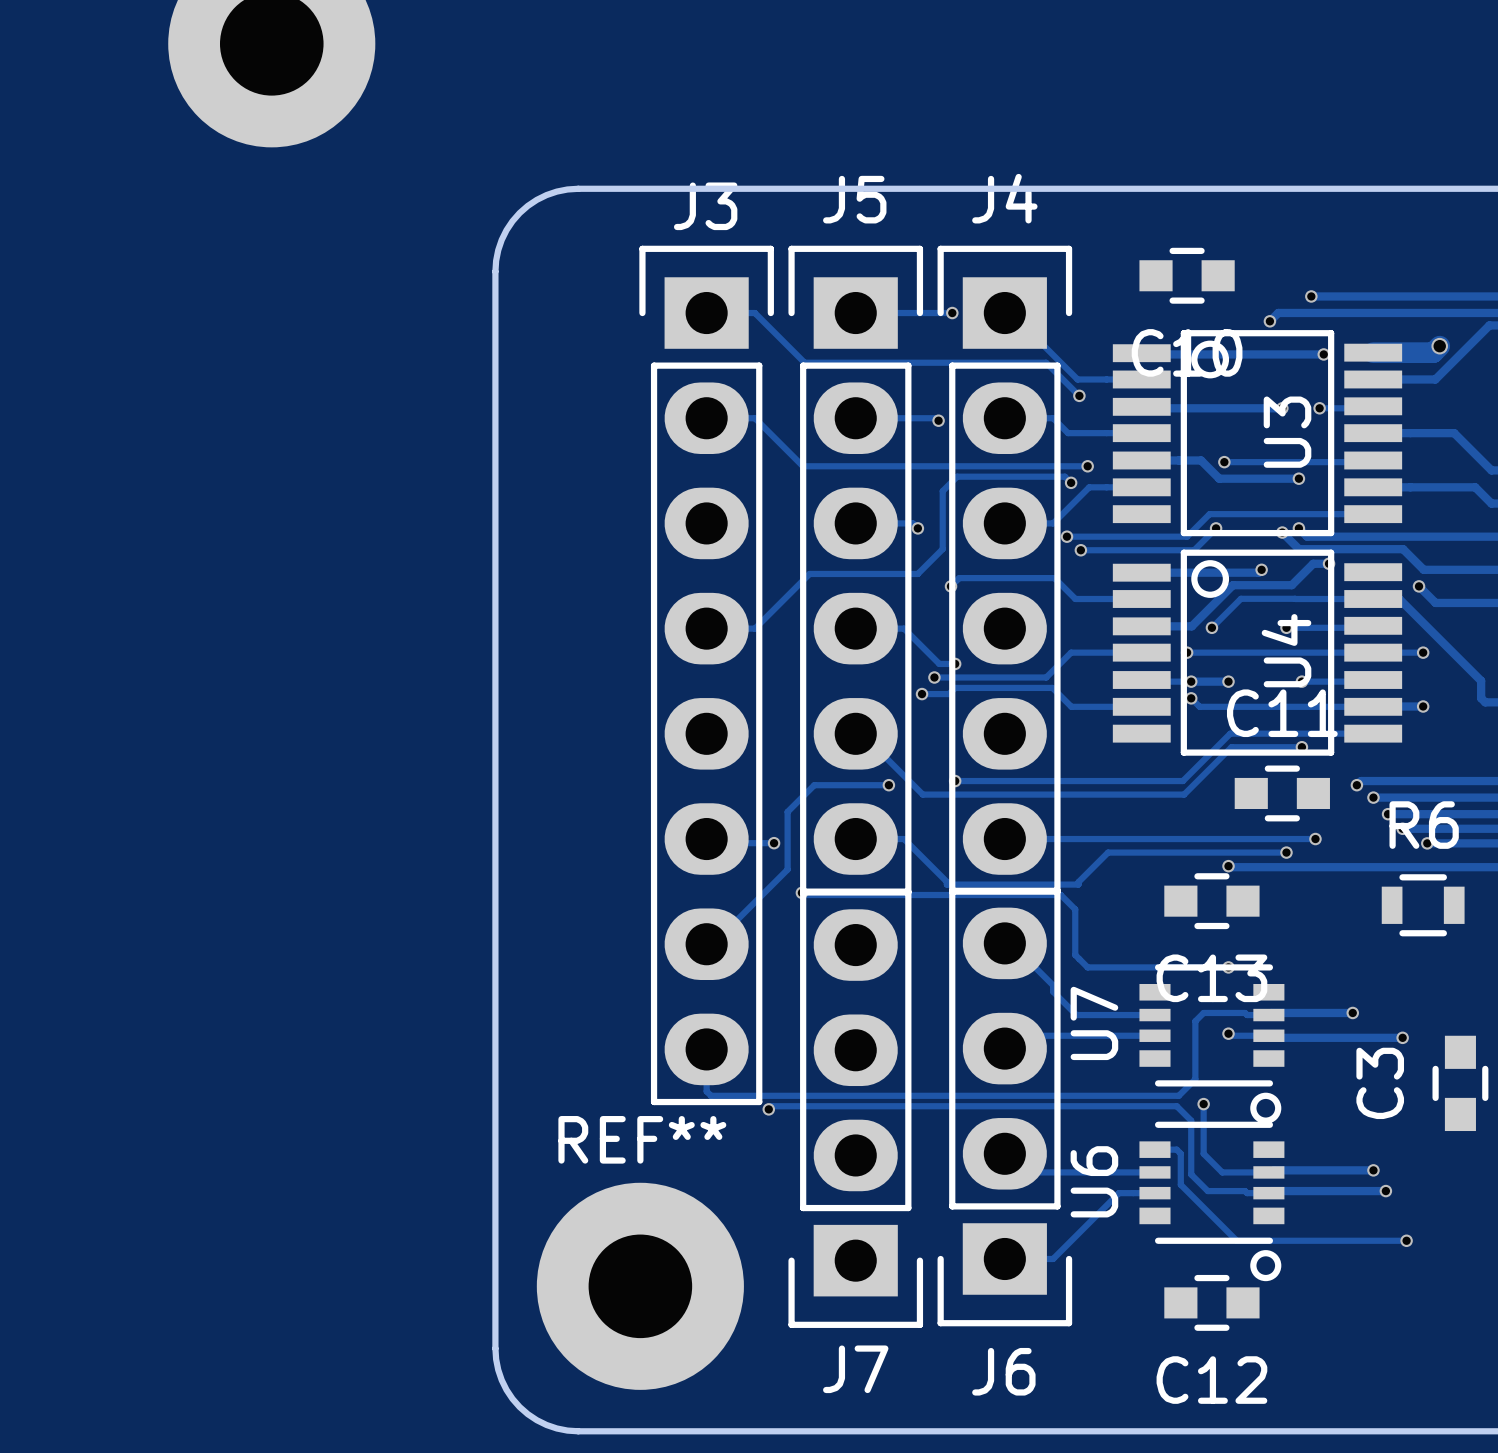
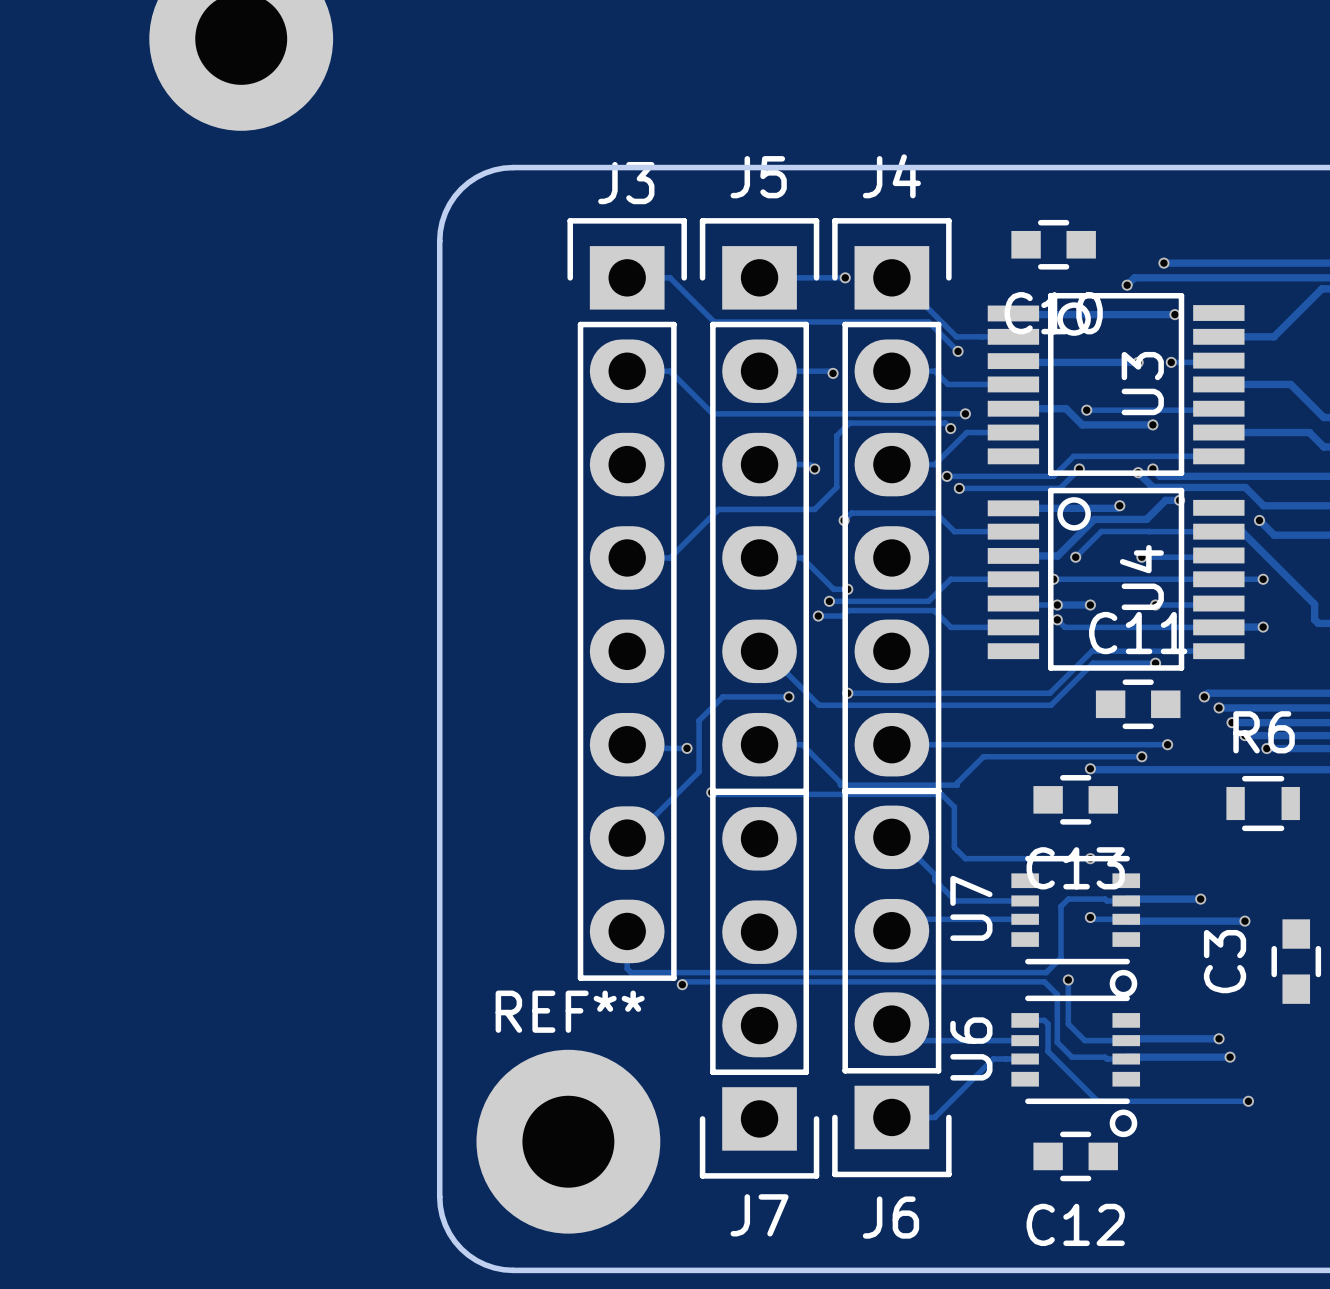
track: (1439, 346) (1433, 352) (1373, 352) -> none
via: (1439, 346) -> none

